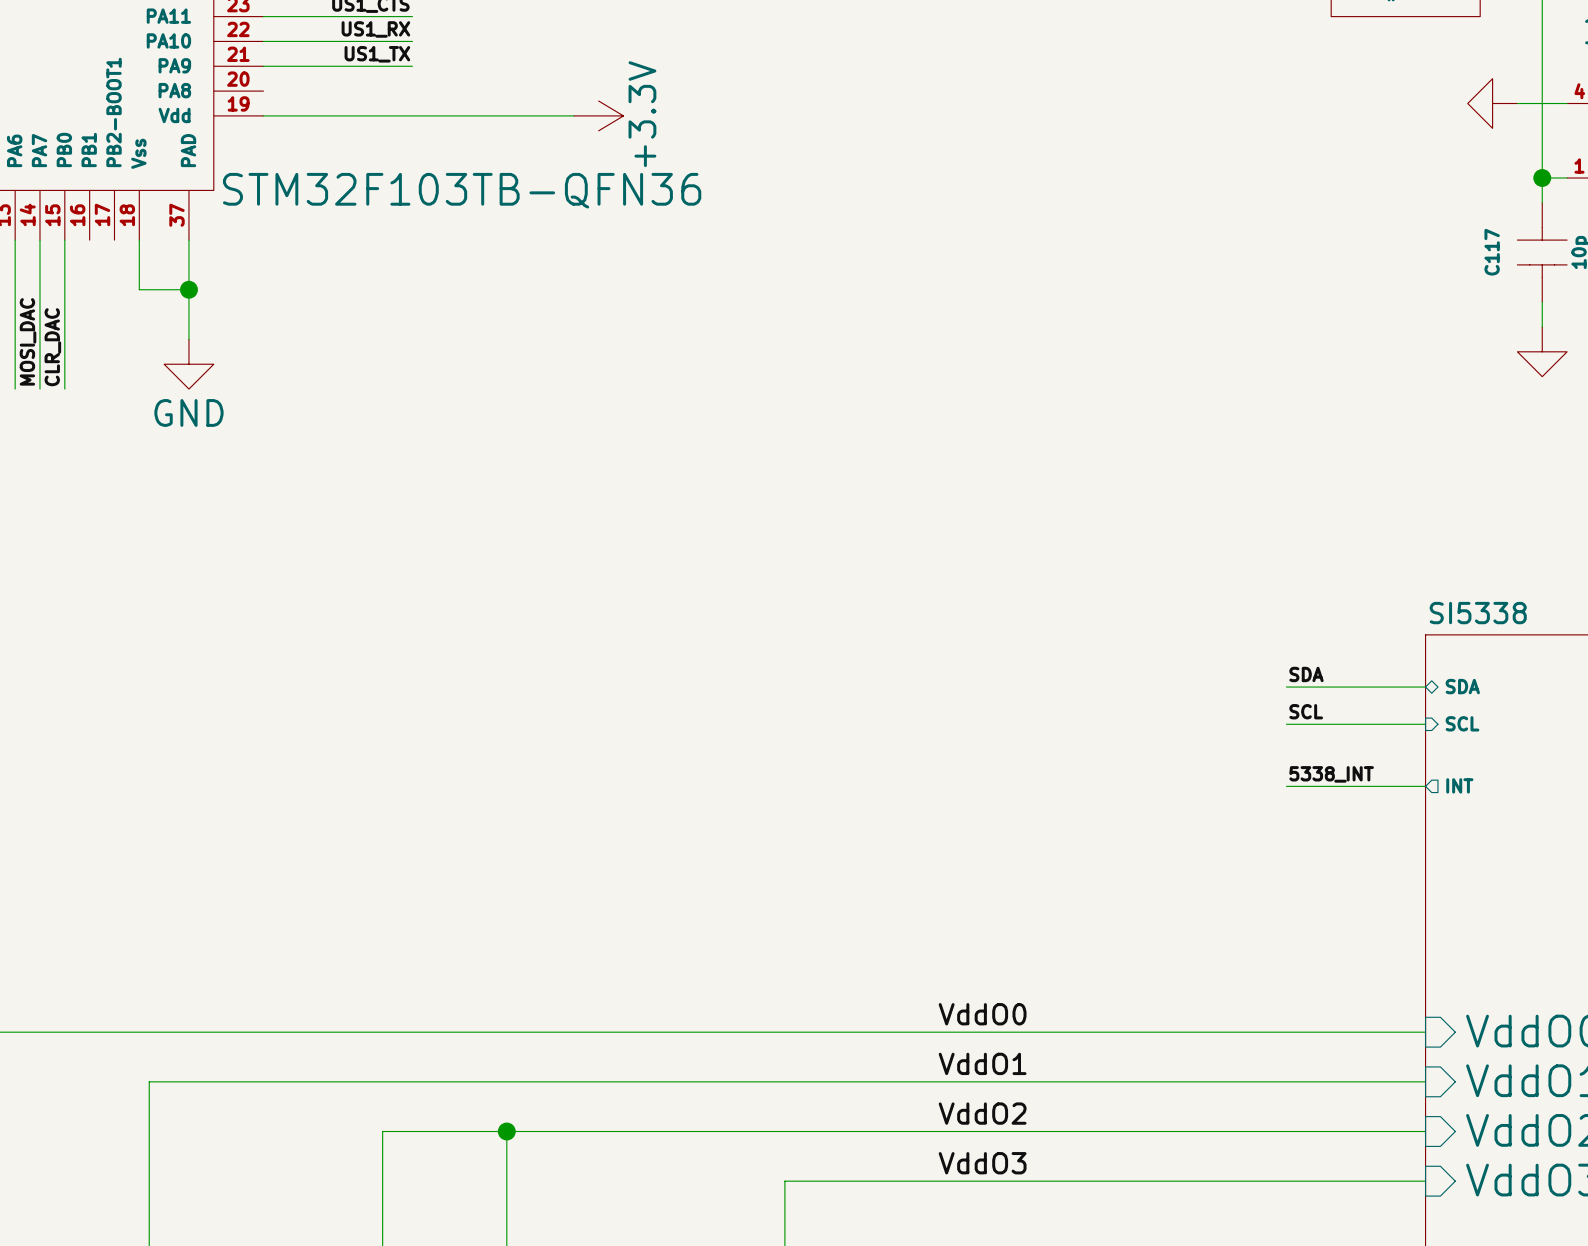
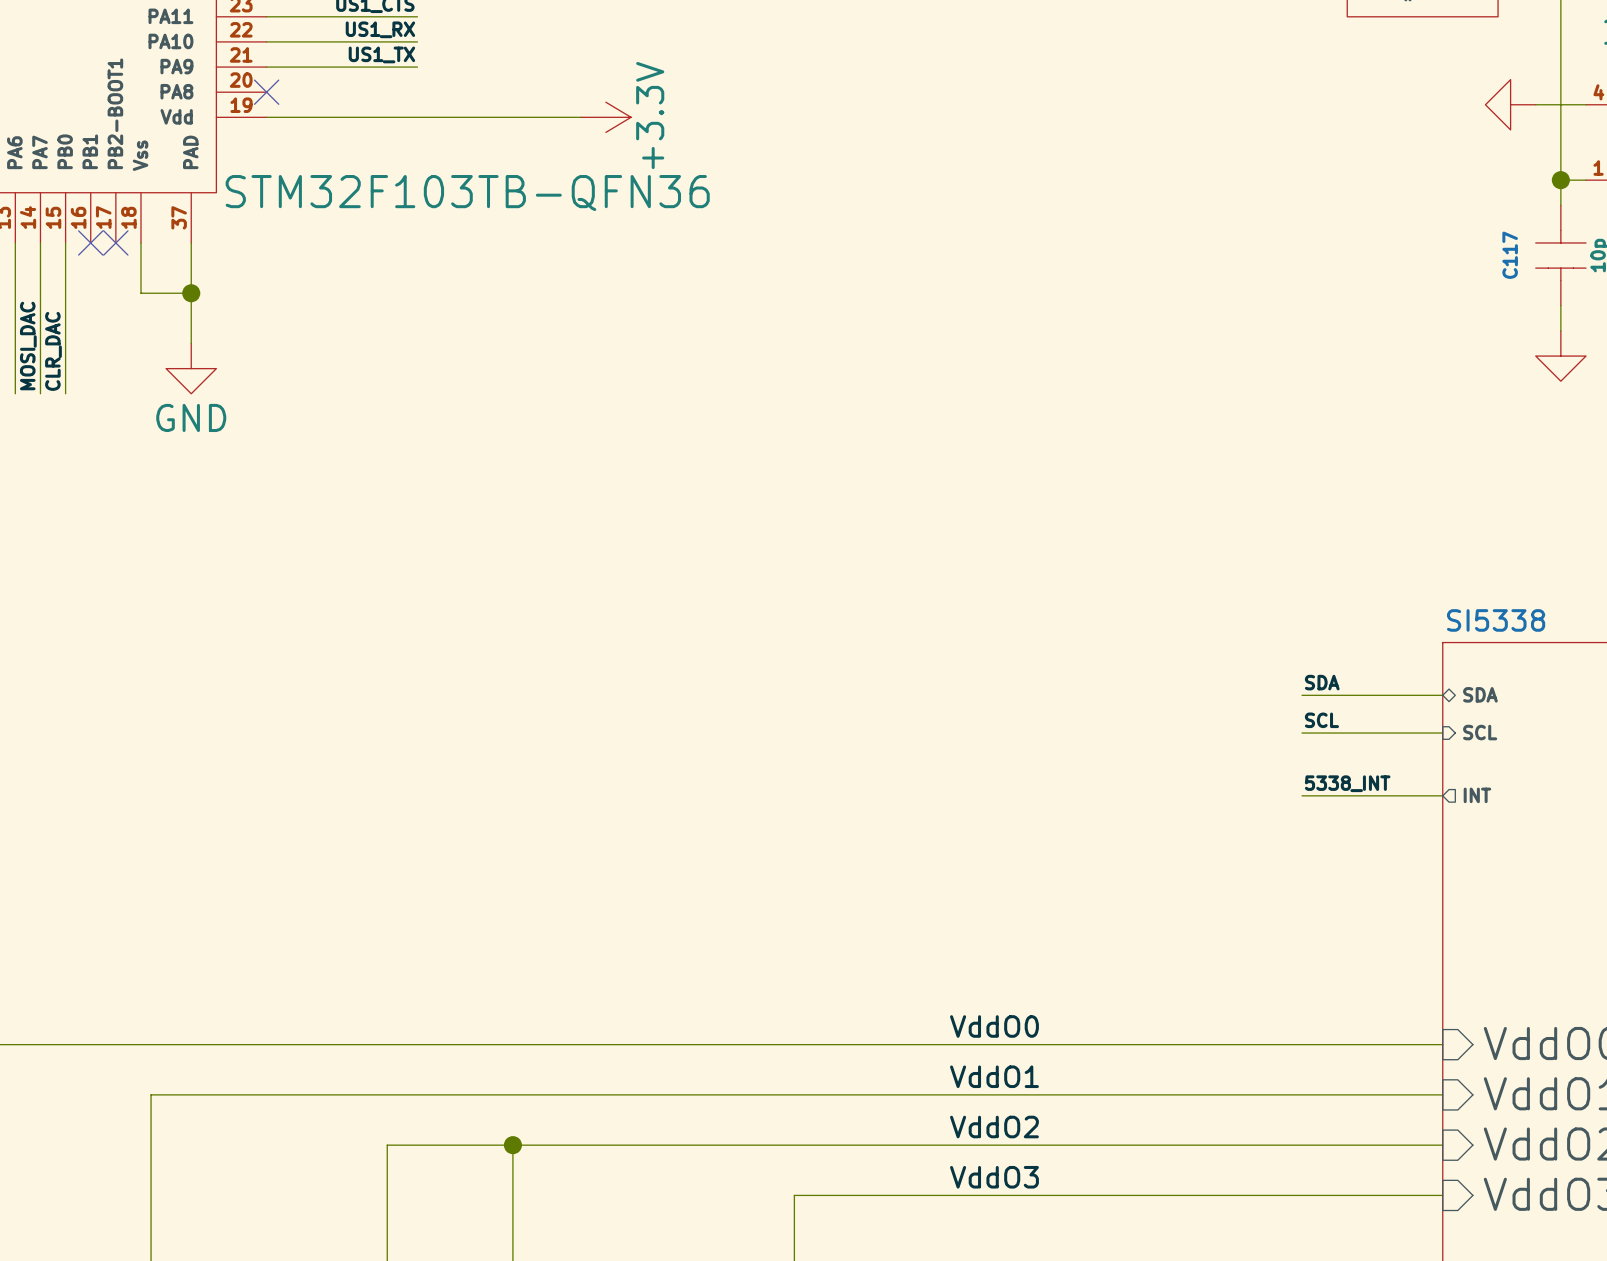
no-connect mark: none -> (266, 92)
no-connect mark: none -> (90, 242)
no-connect mark: none -> (115, 242)

